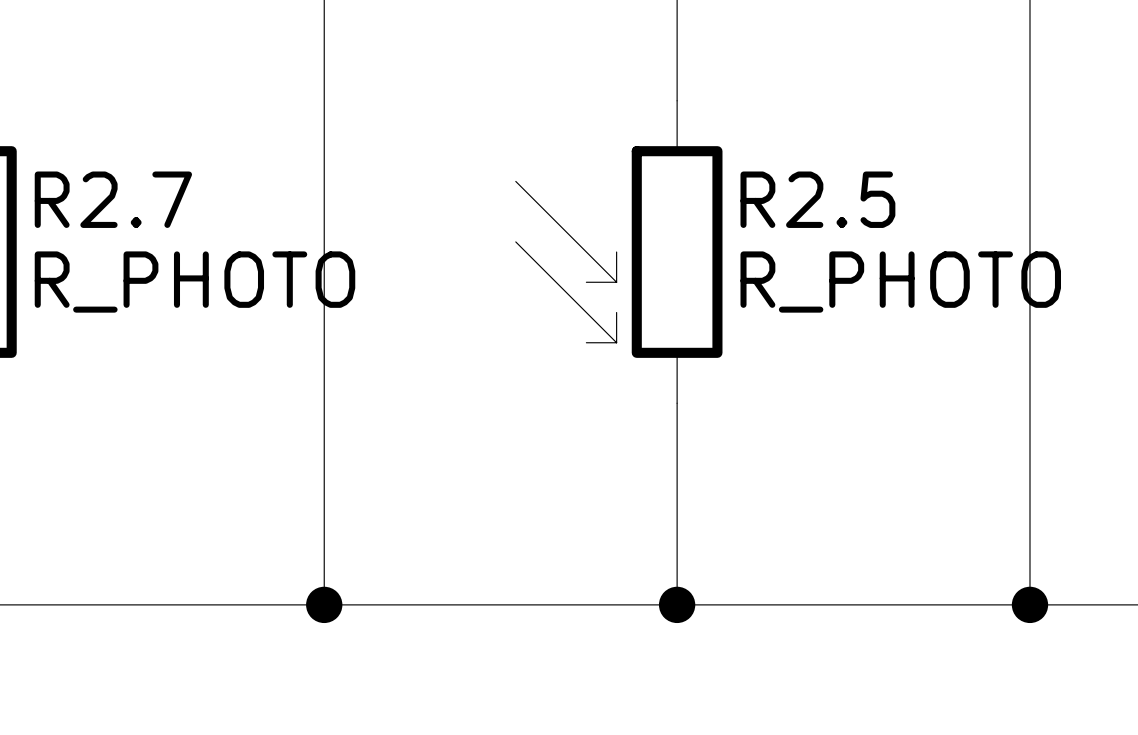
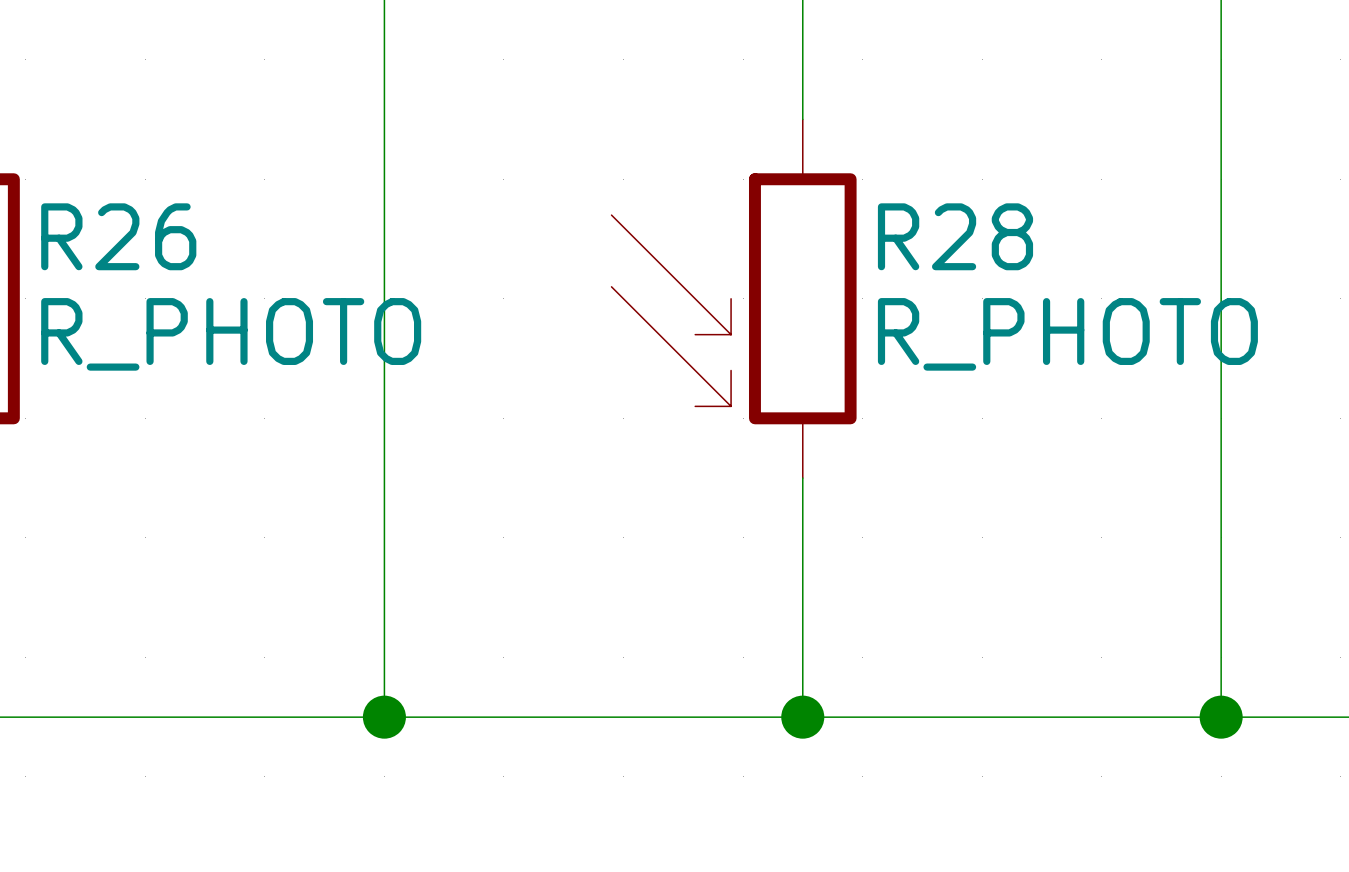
R2.7 name: R2.7 (113, 199) -> R26 (118, 236)
R2.5 name: R2.5 (817, 199) -> R28 (955, 236)

